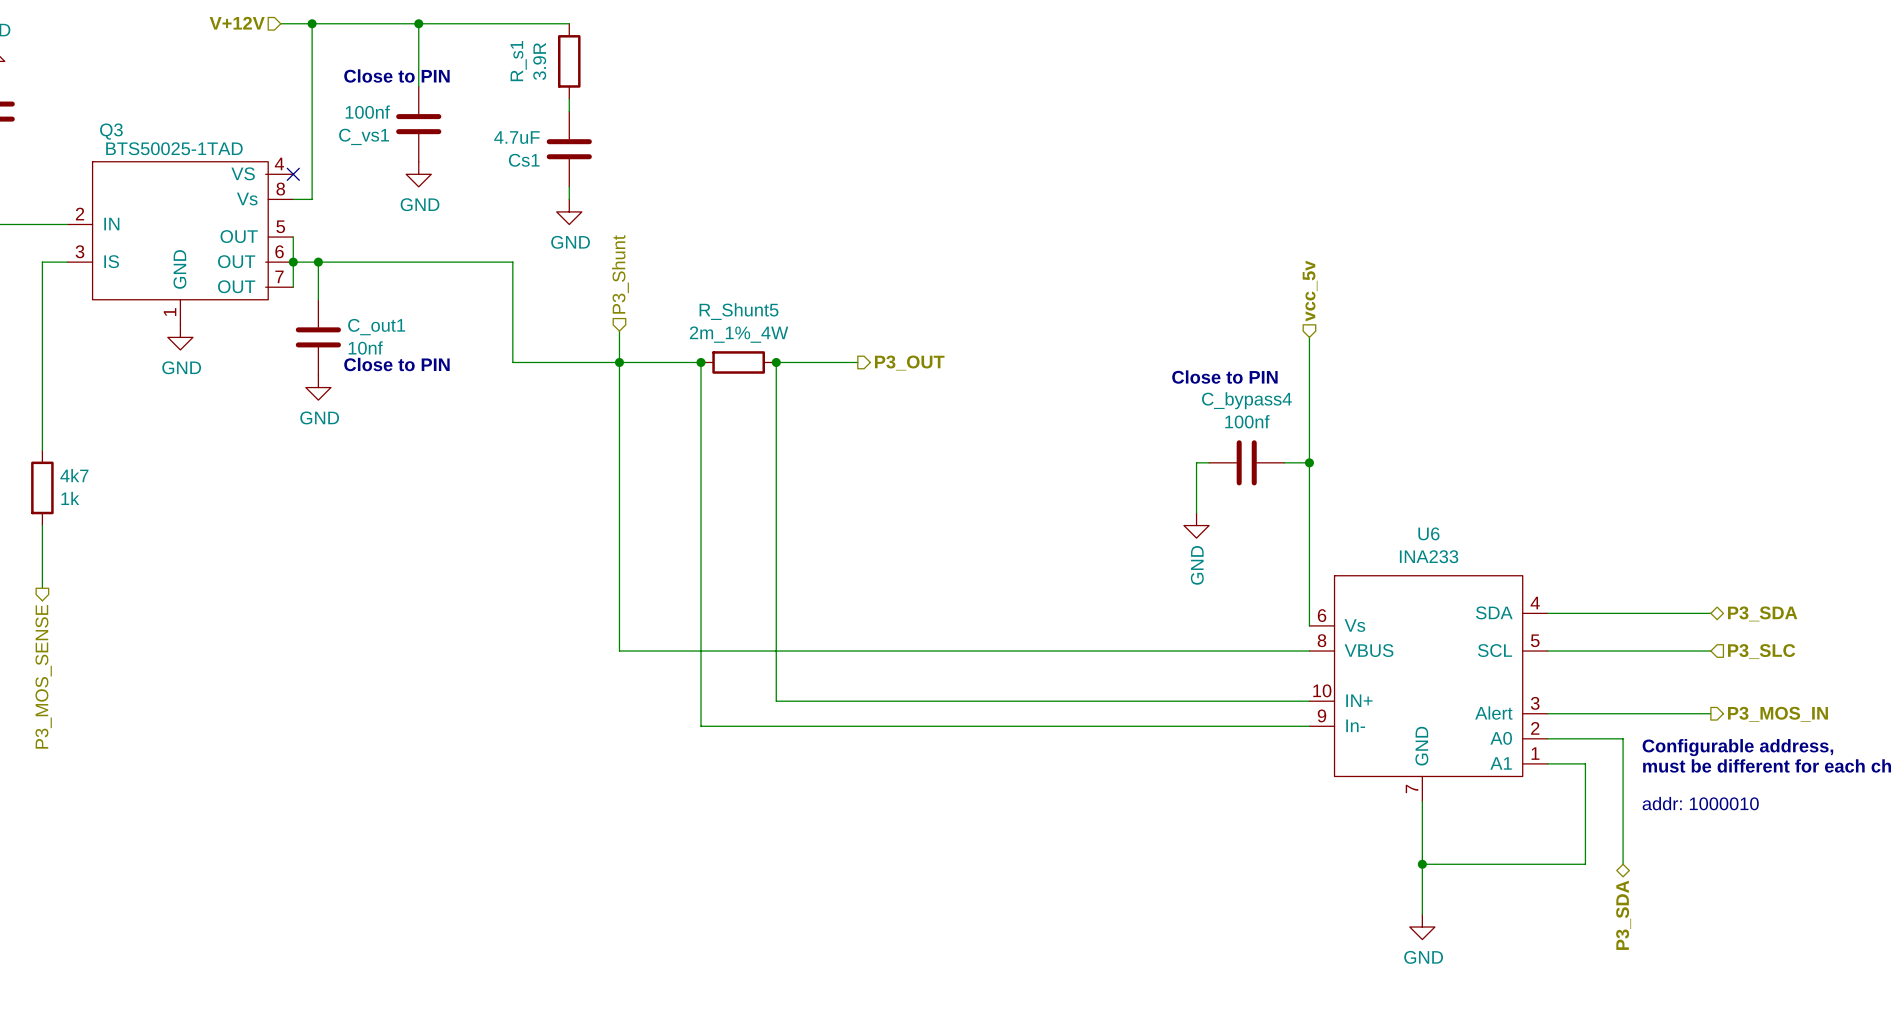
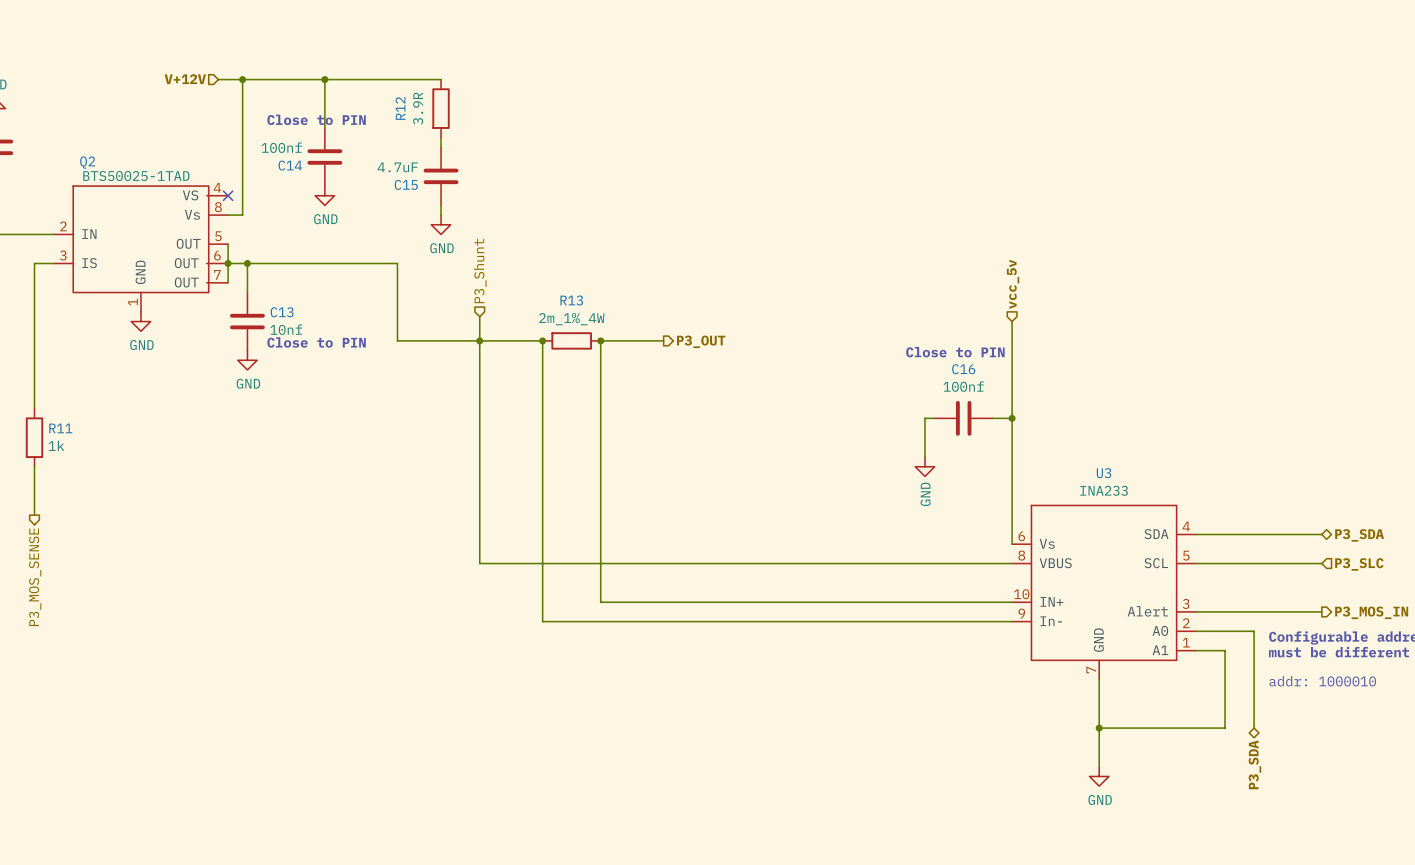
R_s1 name: R_s1 (518, 61) -> R12 (400, 108)
Q3 name: Q3 (111, 131) -> Q2 (87, 162)
C_vs1 name: C_vs1 (364, 136) -> C14 (290, 165)
Cs1 name: Cs1 (524, 160) -> C15 (406, 184)
R_Shunt5 name: R_Shunt5 (739, 311) -> R13 (571, 300)
C_out1 name: C_out1 (376, 327) -> C13 (282, 312)
C_bypass4 name: C_bypass4 (1246, 400) -> C16 (963, 369)
4k7 name: 4k7 (74, 475) -> R11 (60, 428)
U6 name: U6 (1428, 533) -> U3 (1104, 473)

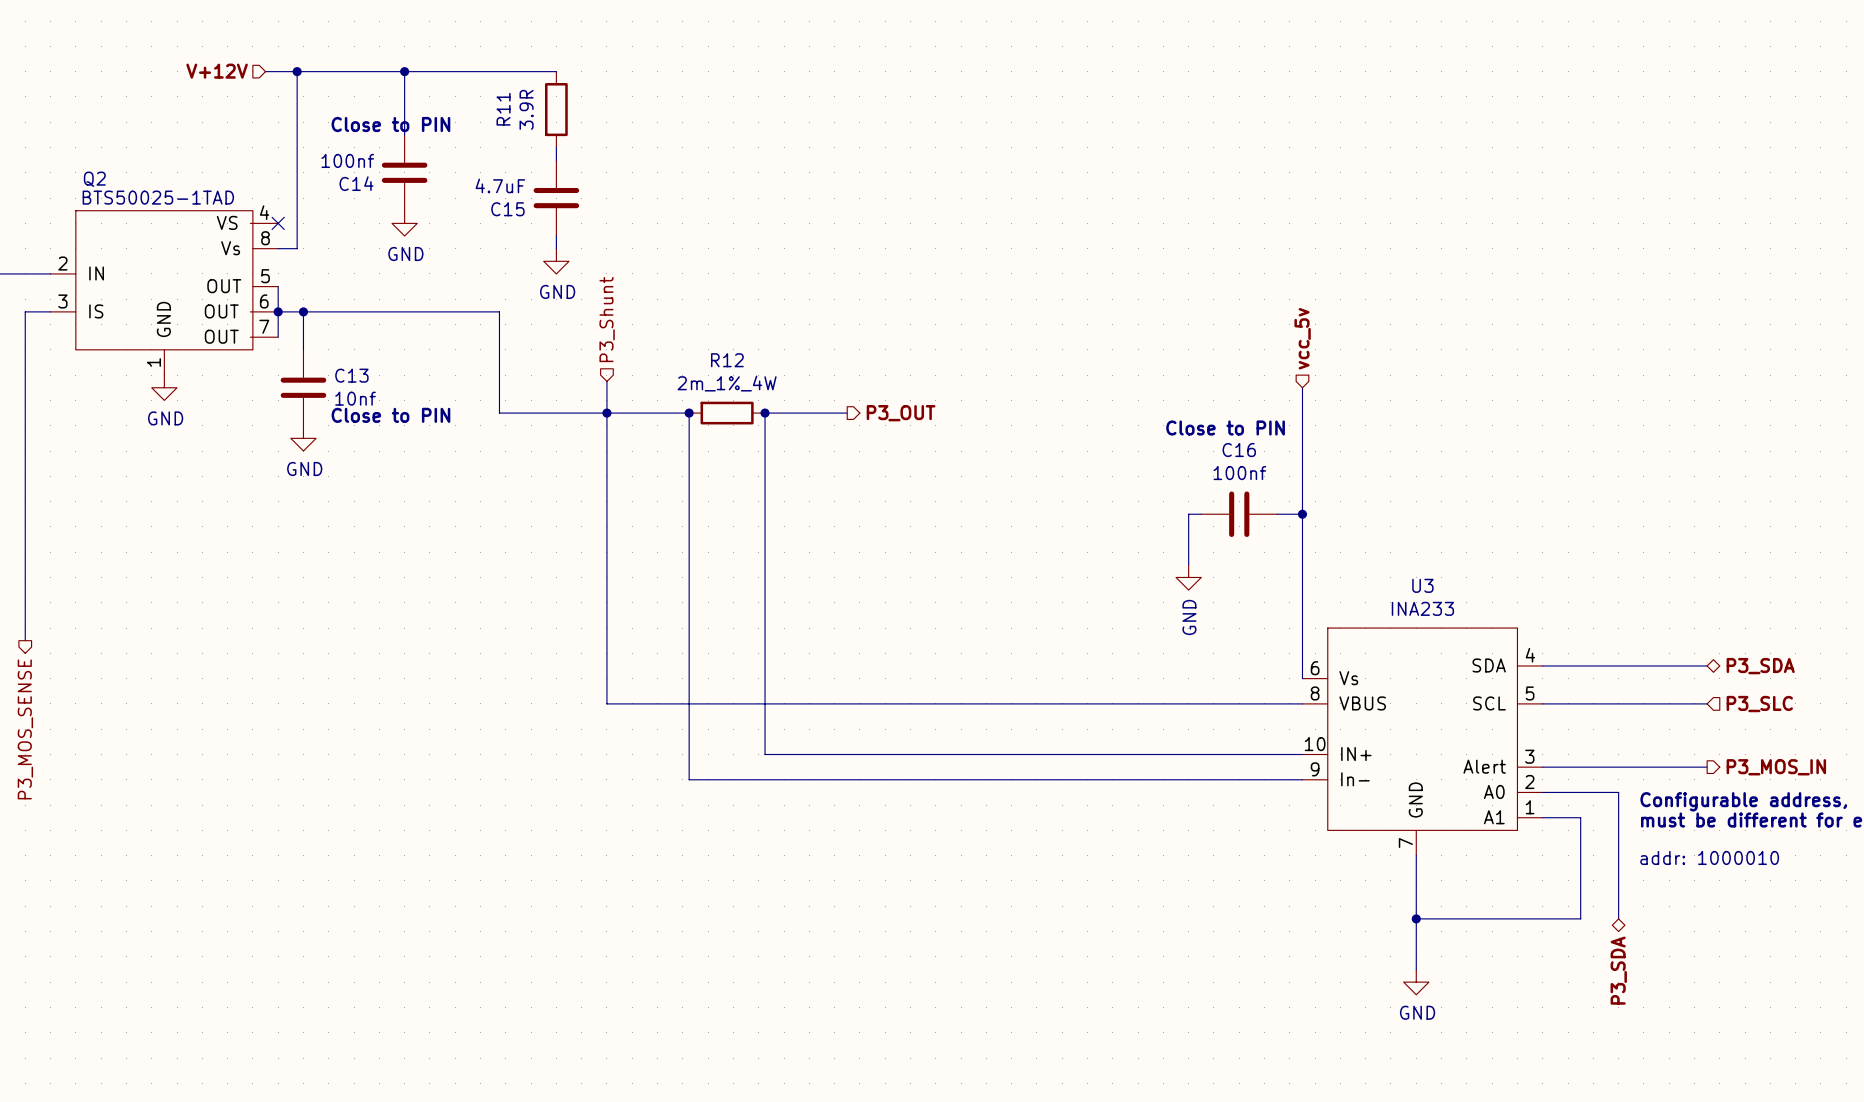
R12 name: R12 (400, 108) -> R11 (503, 109)
R13 name: R13 (571, 300) -> R12 (727, 360)
wire: none -> (25, 501) (25, 577)
R11: 1k (34, 437) -> none

